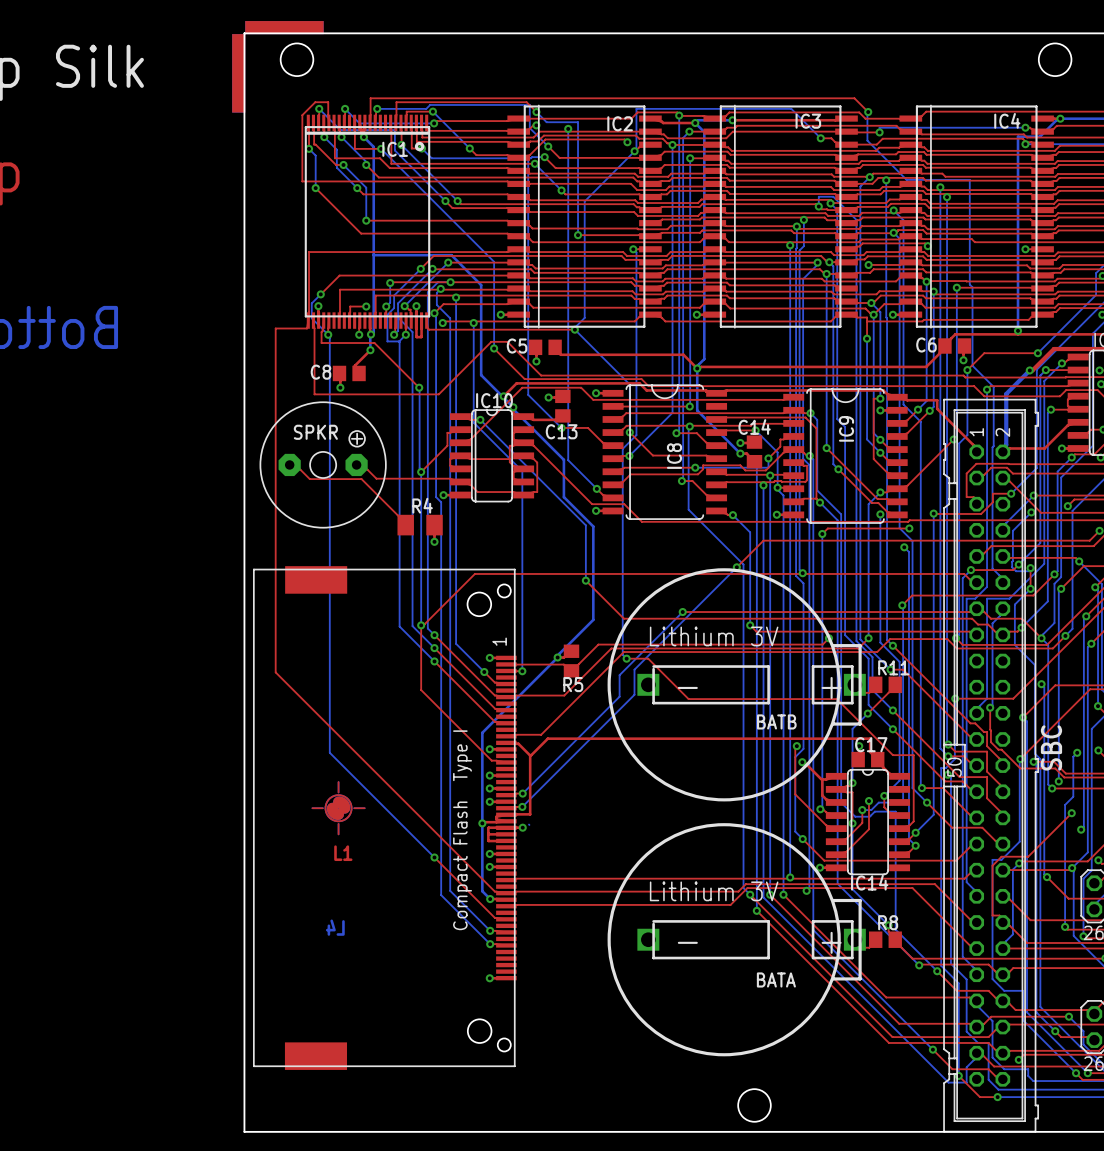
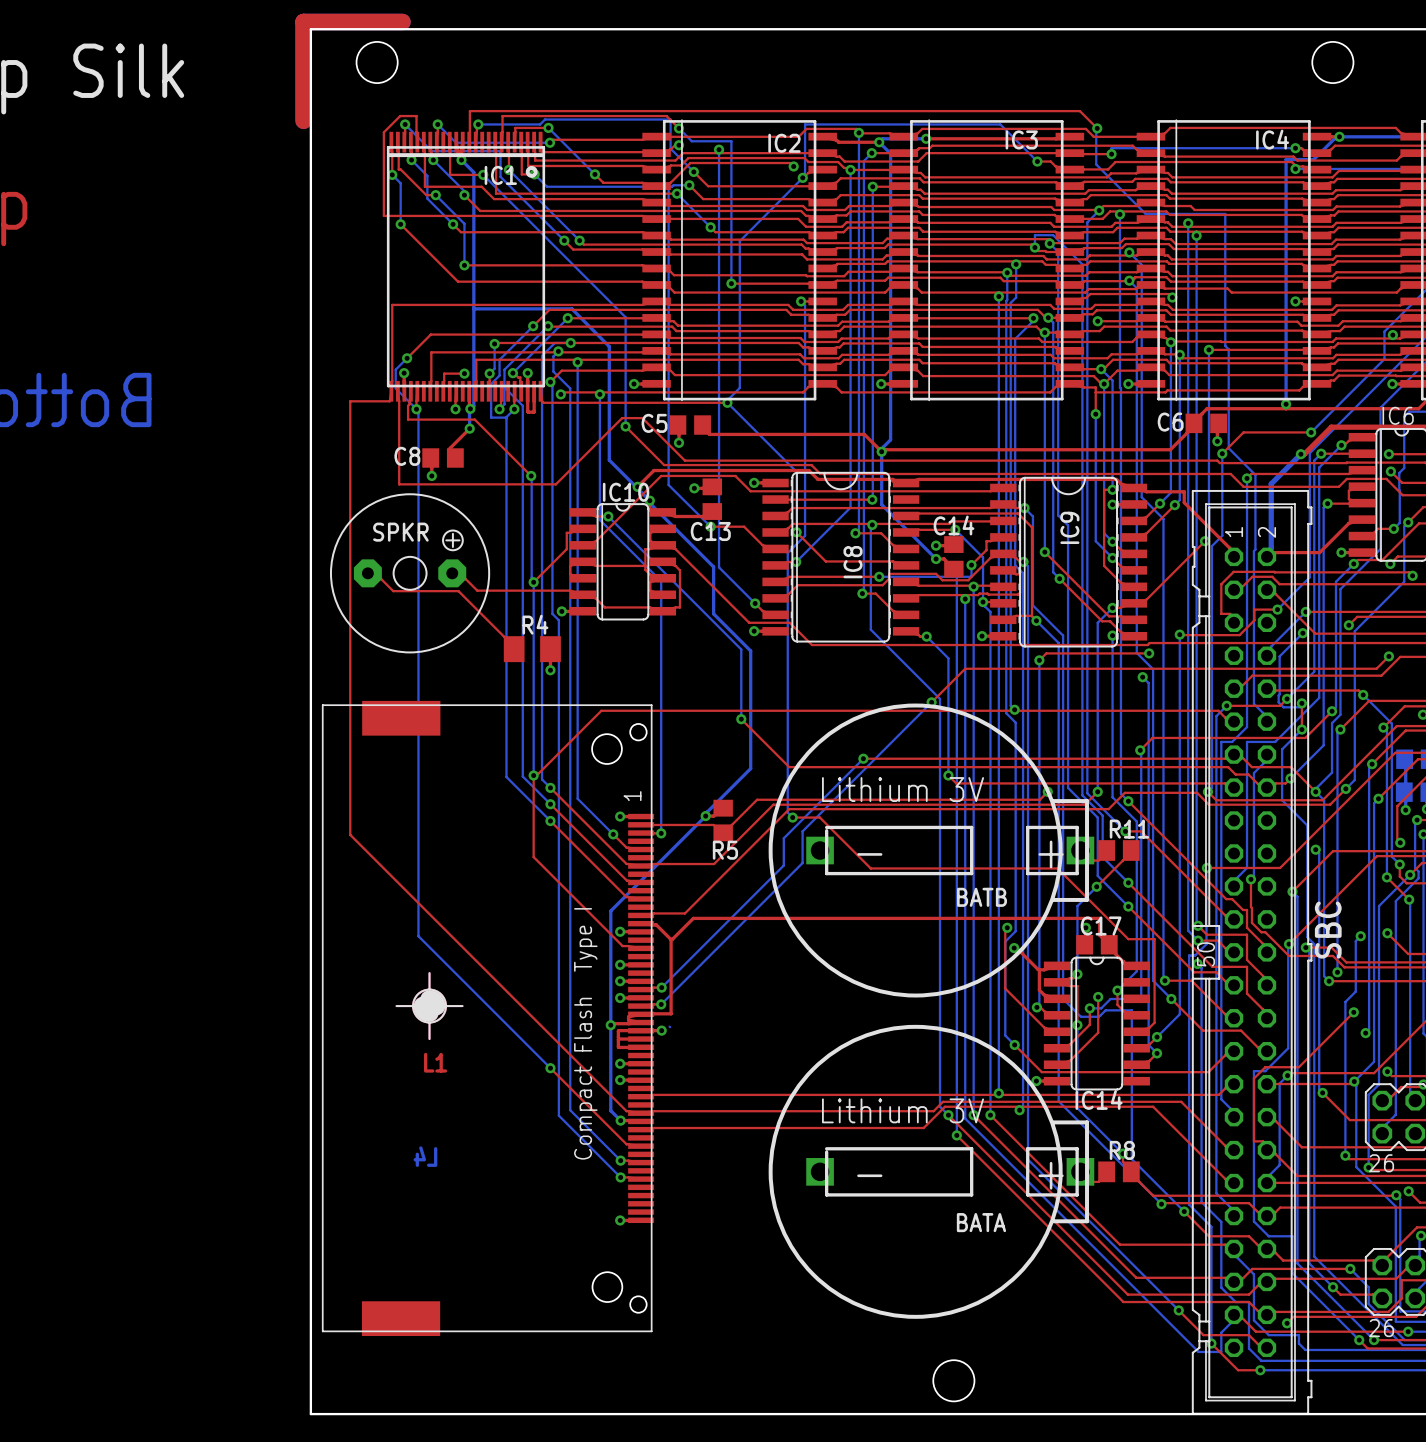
drawing shape: [232, 21, 324, 113] -> [295, 13, 411, 130]
IC8 footprint: [602, 384, 728, 520] -> [762, 471, 920, 643]
IC9 footprint: [783, 388, 908, 524] -> [990, 476, 1147, 648]
drawing shape: [311, 781, 366, 836] -> [395, 972, 464, 1041]

